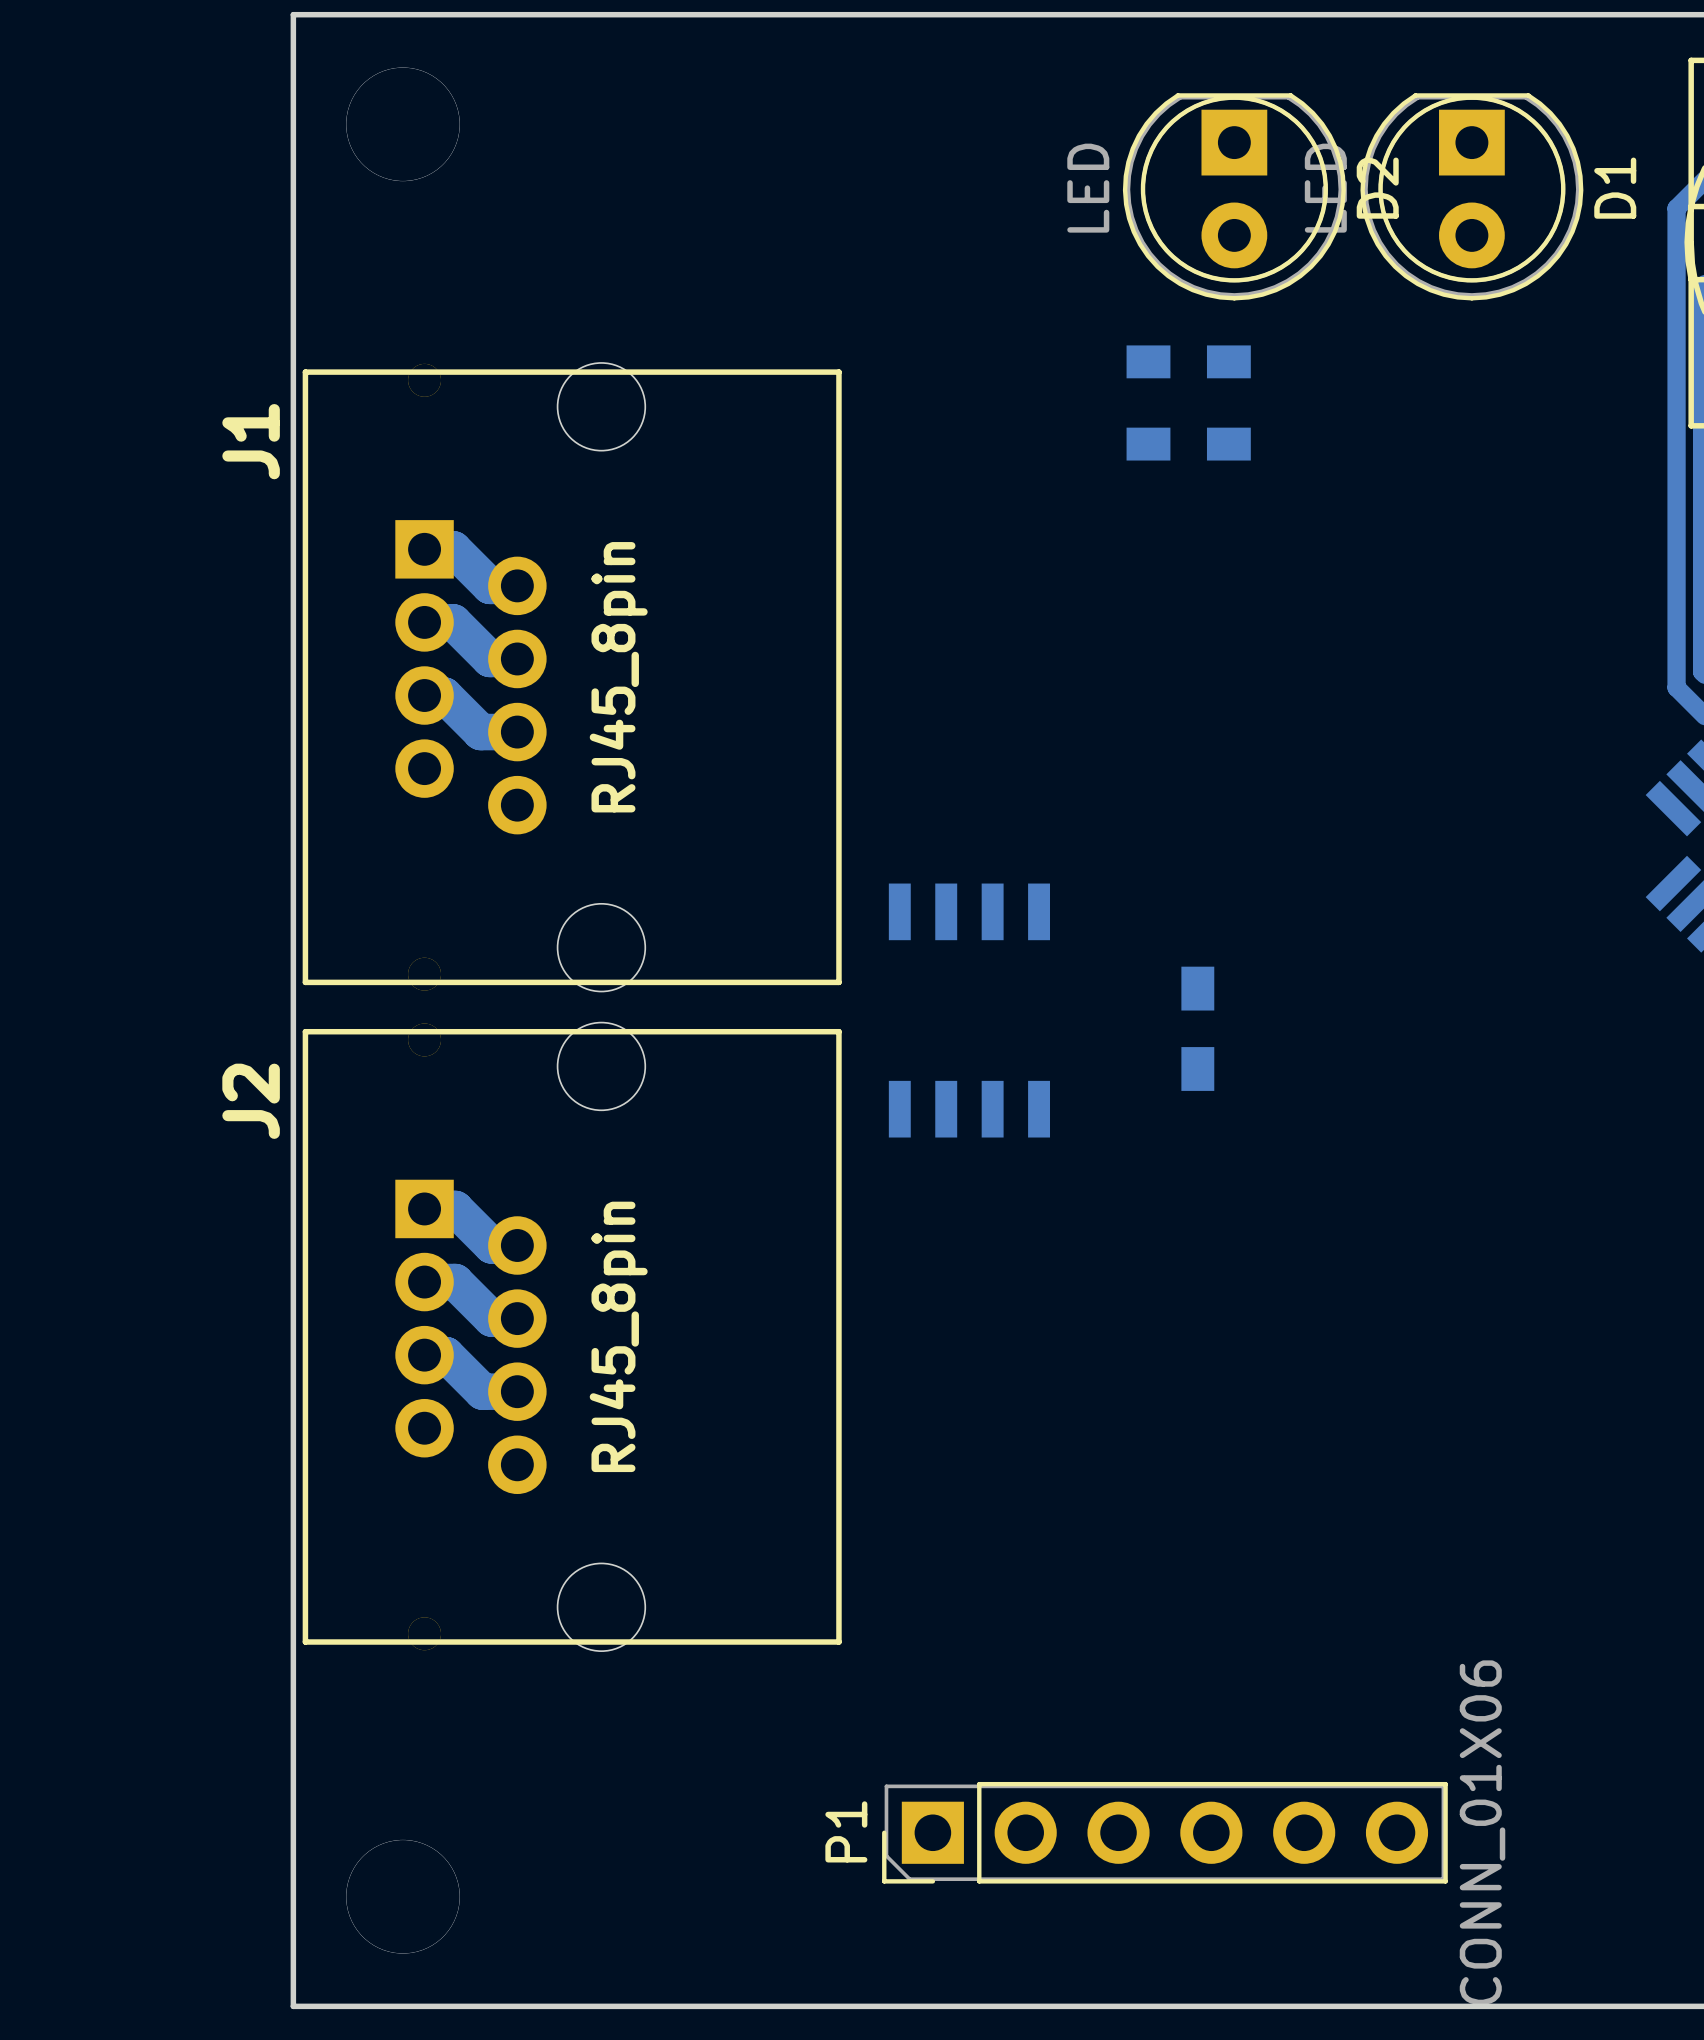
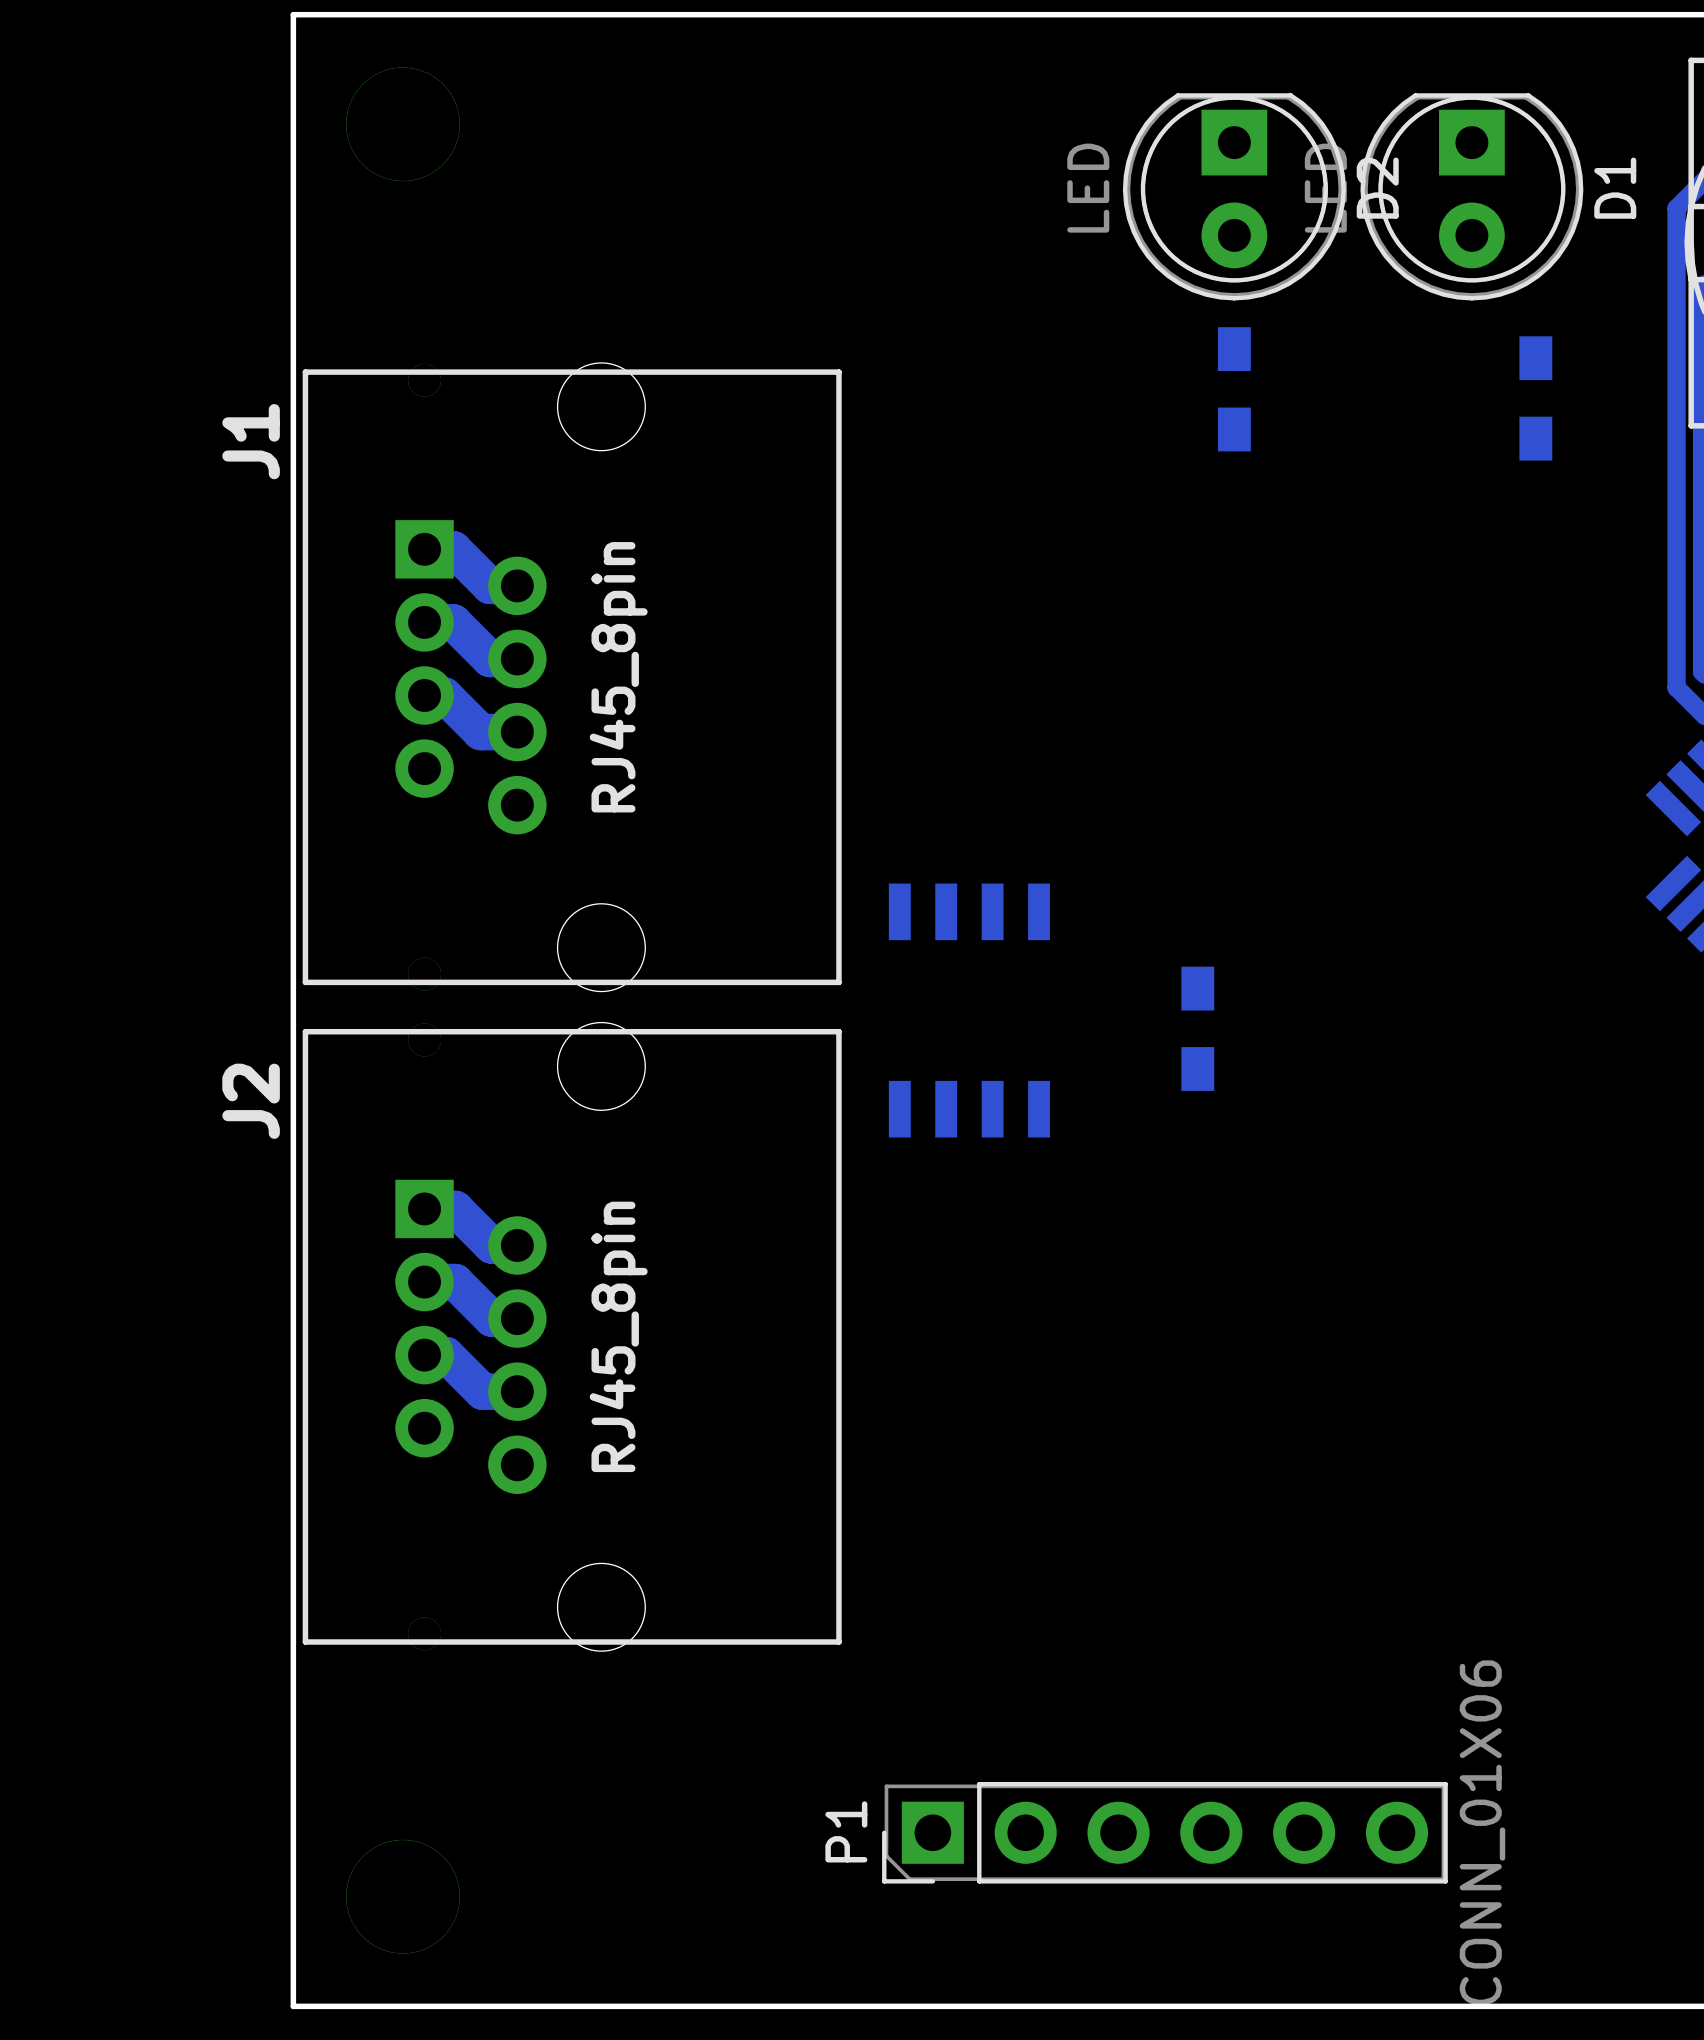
part: (1188, 361) -> none
part: none -> (1234, 389)
part: none -> (1535, 398)
part: (1188, 444) -> none

